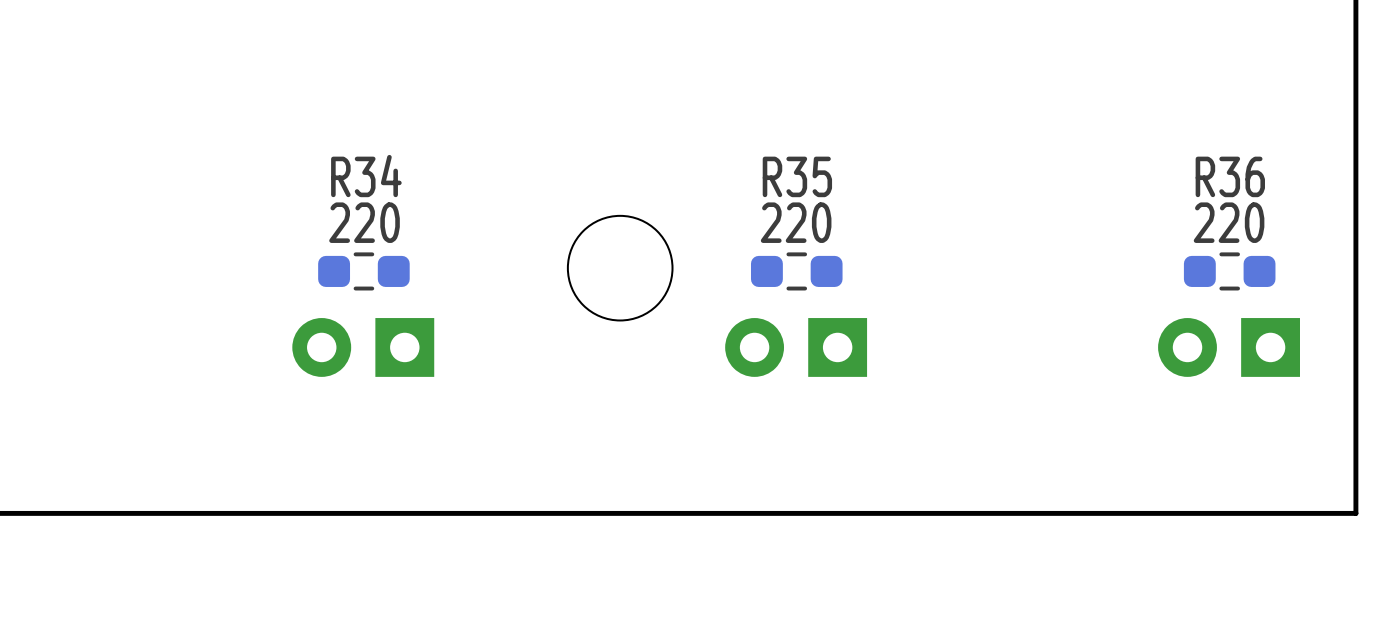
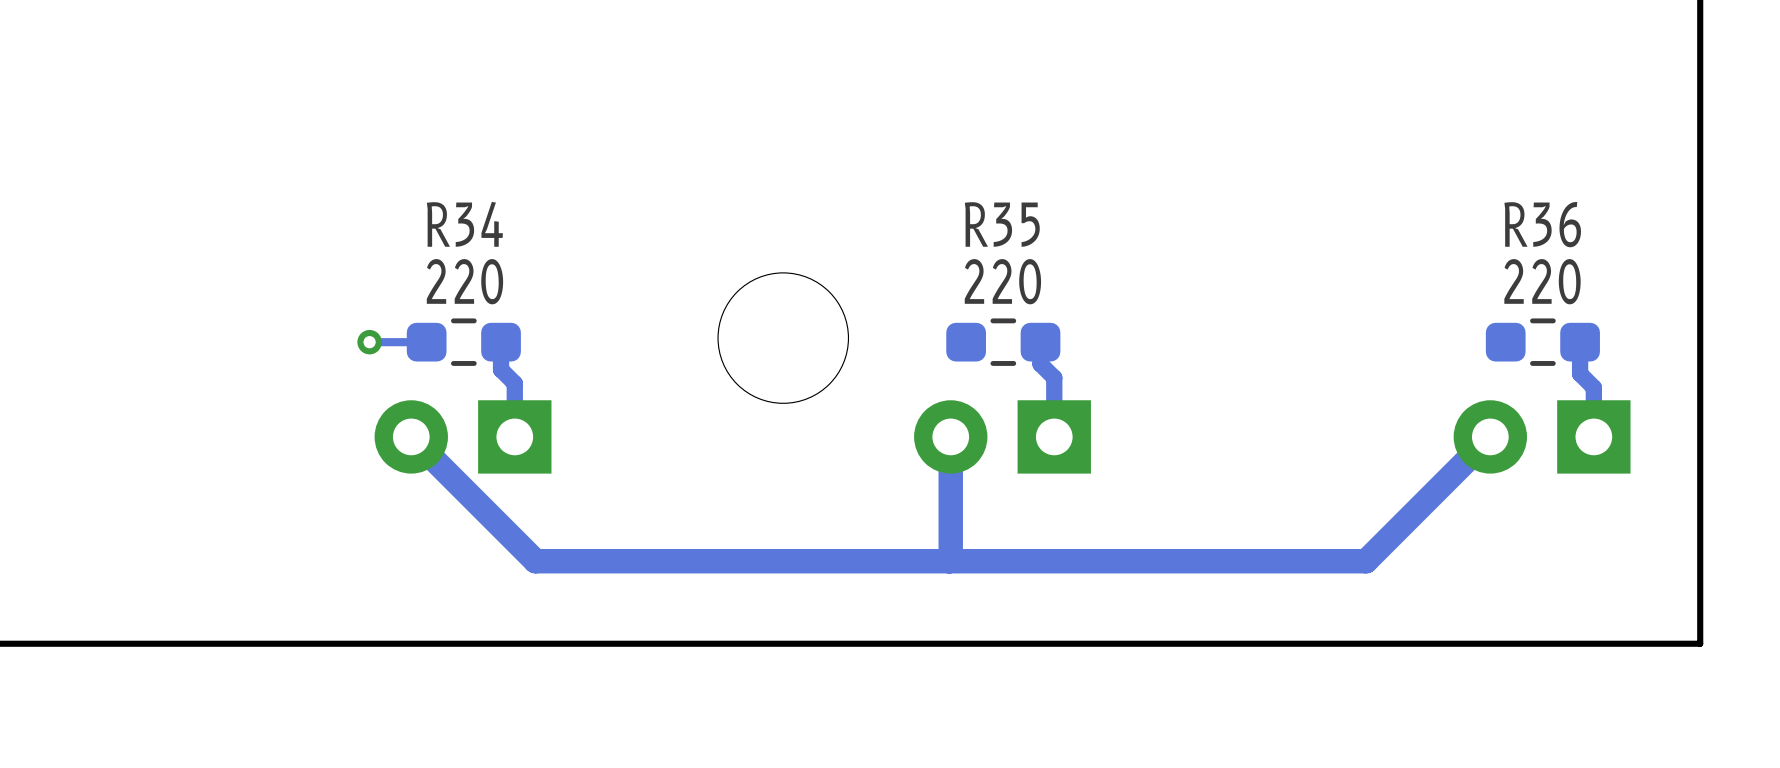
via: none -> (369, 342)
track: none -> (426, 342) (369, 342)
track: none -> (501, 342) (501, 369) (514, 383) (514, 436)
track: none -> (1040, 342) (1040, 364) (1054, 377) (1054, 436)
track: none -> (1580, 342) (1580, 373) (1593, 387) (1593, 436)
track: none -> (950, 436) (949, 561)
track: none -> (1490, 436) (1366, 561) (535, 561) (411, 436)

